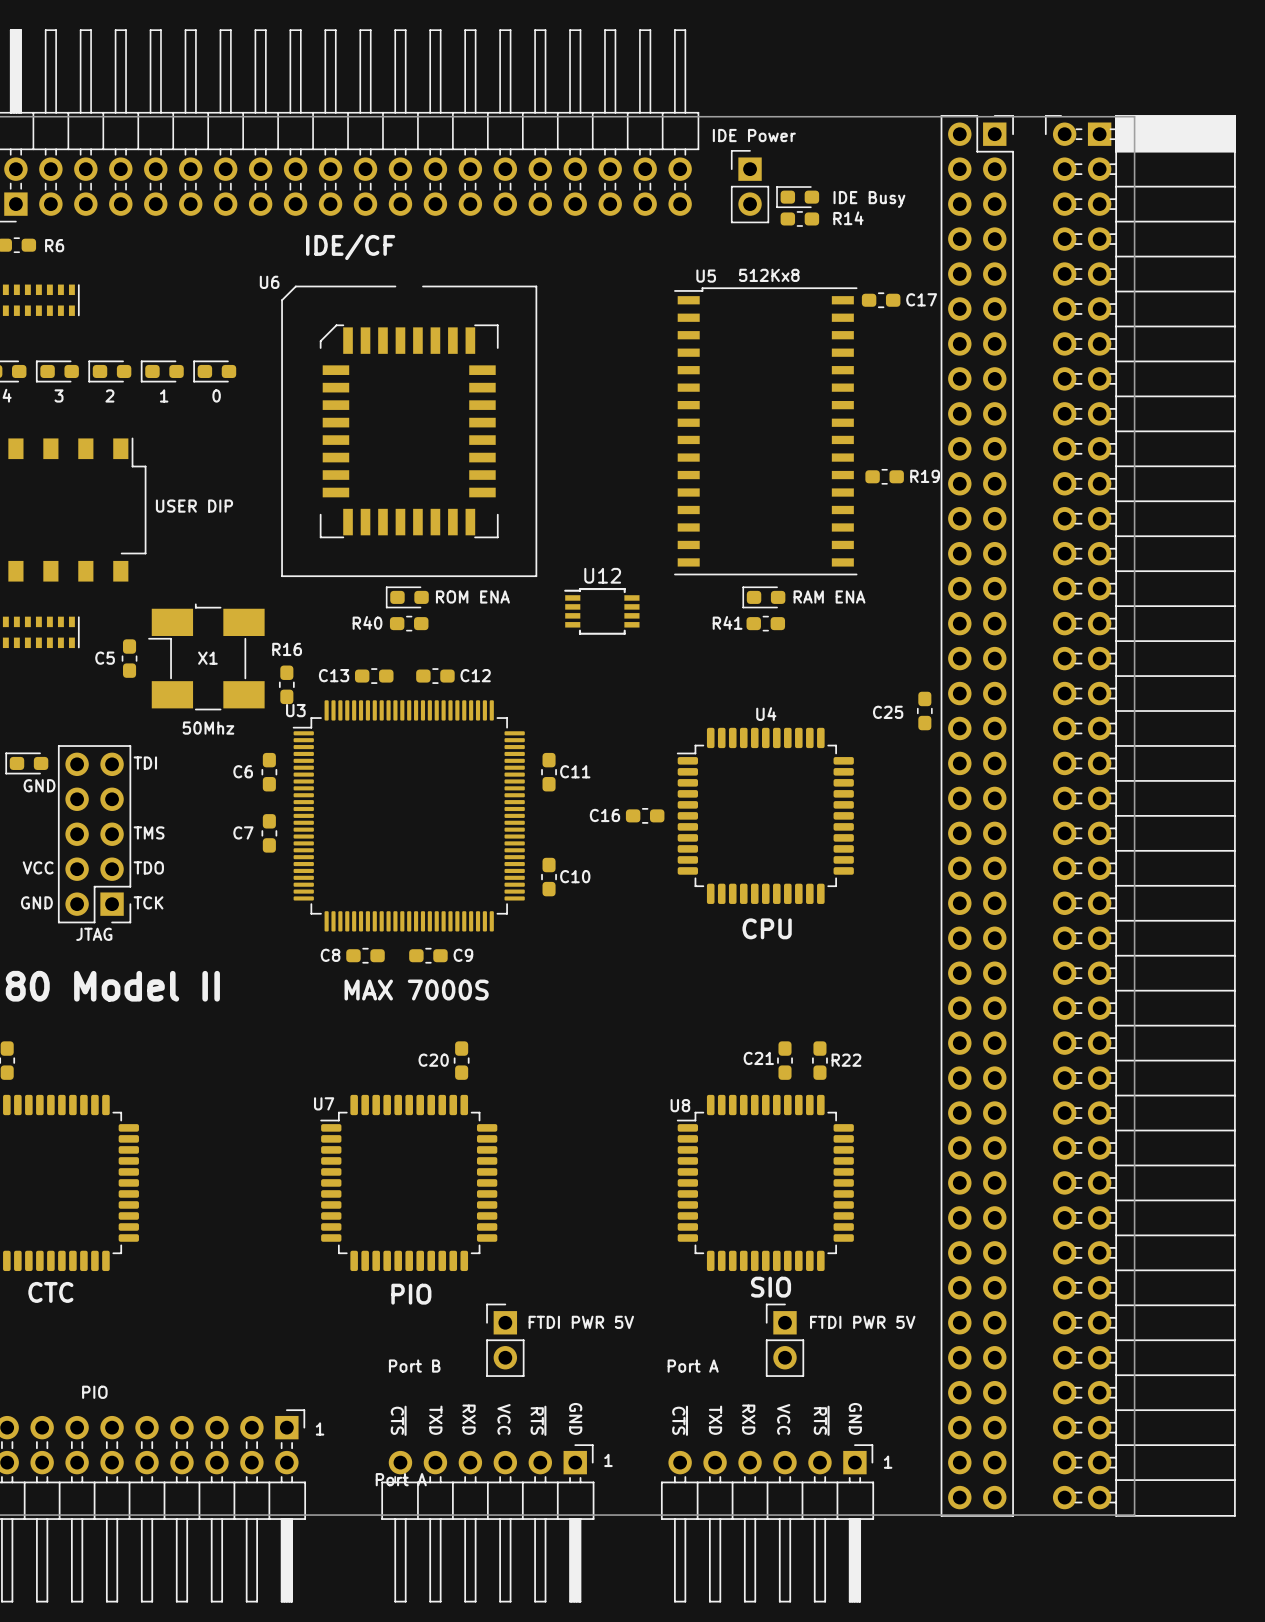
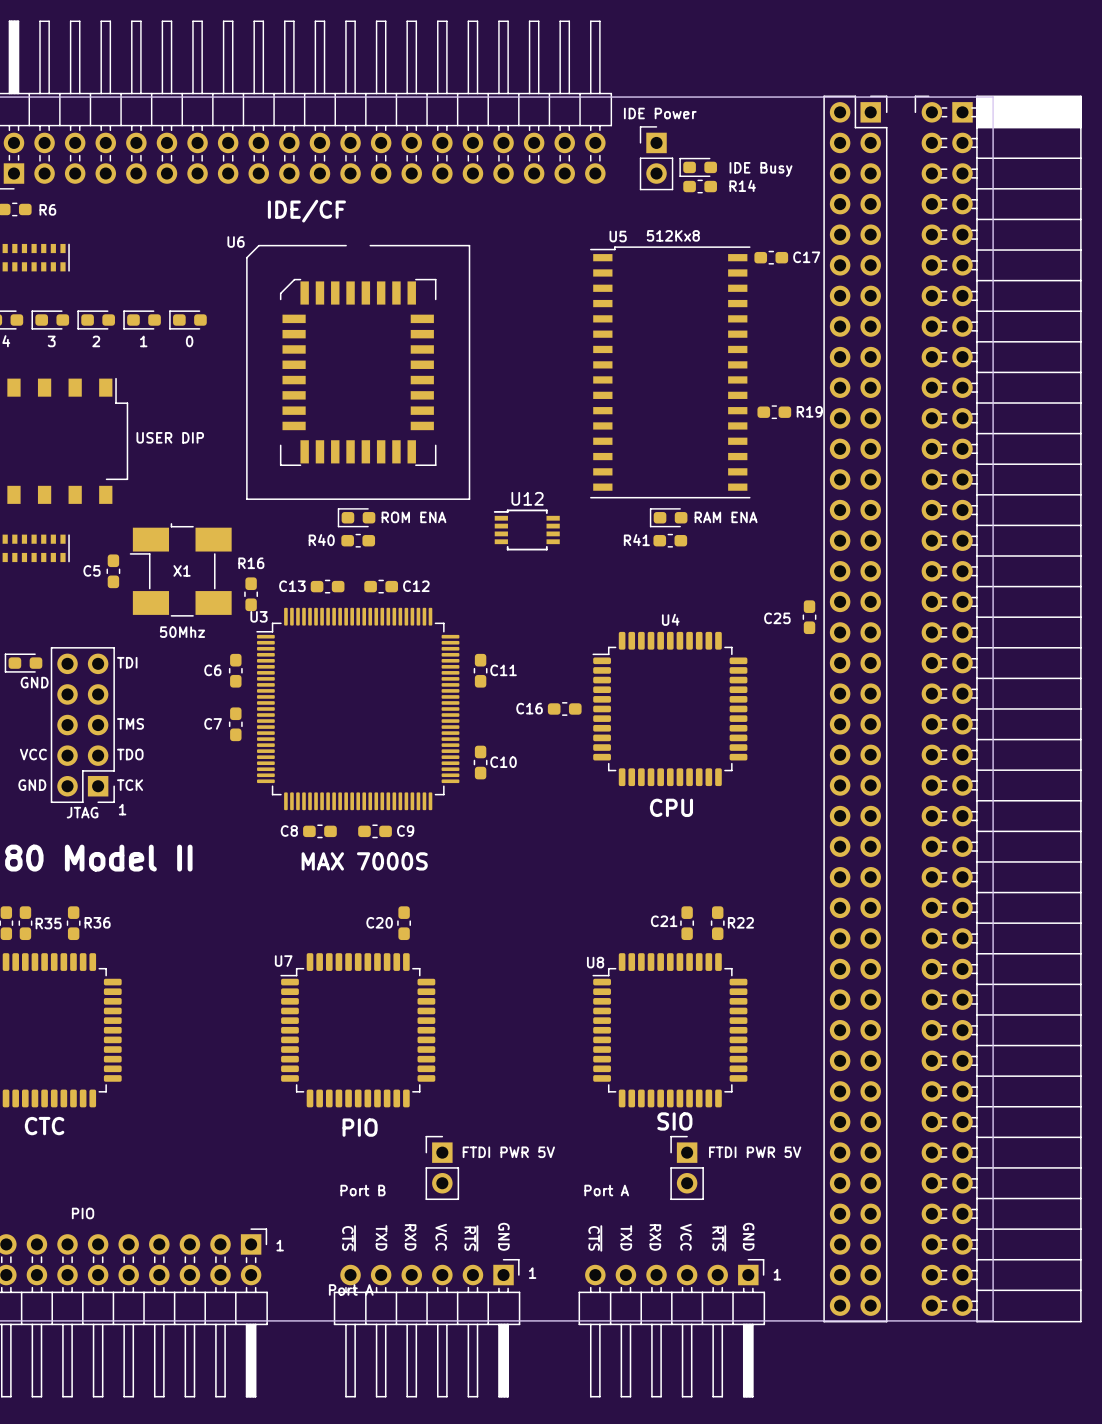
text: none -> 1 (122, 809)
R35: none -> (25, 923)
R36: none -> (73, 923)

